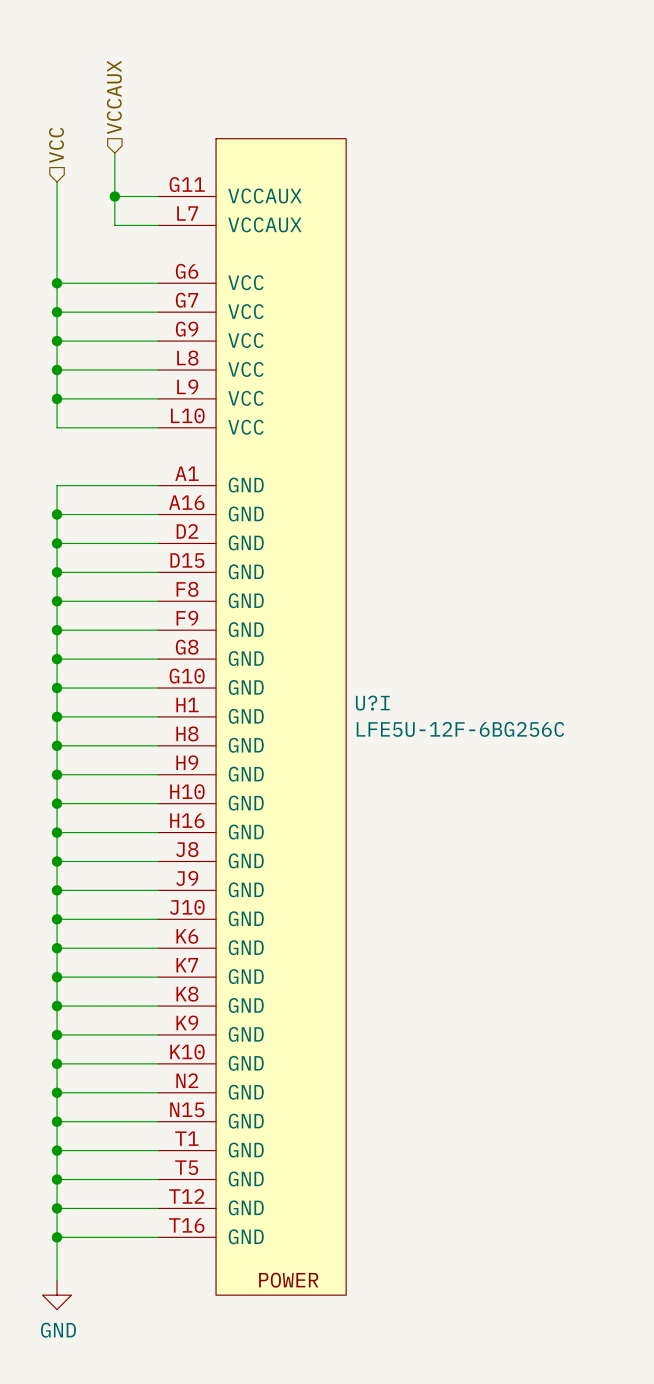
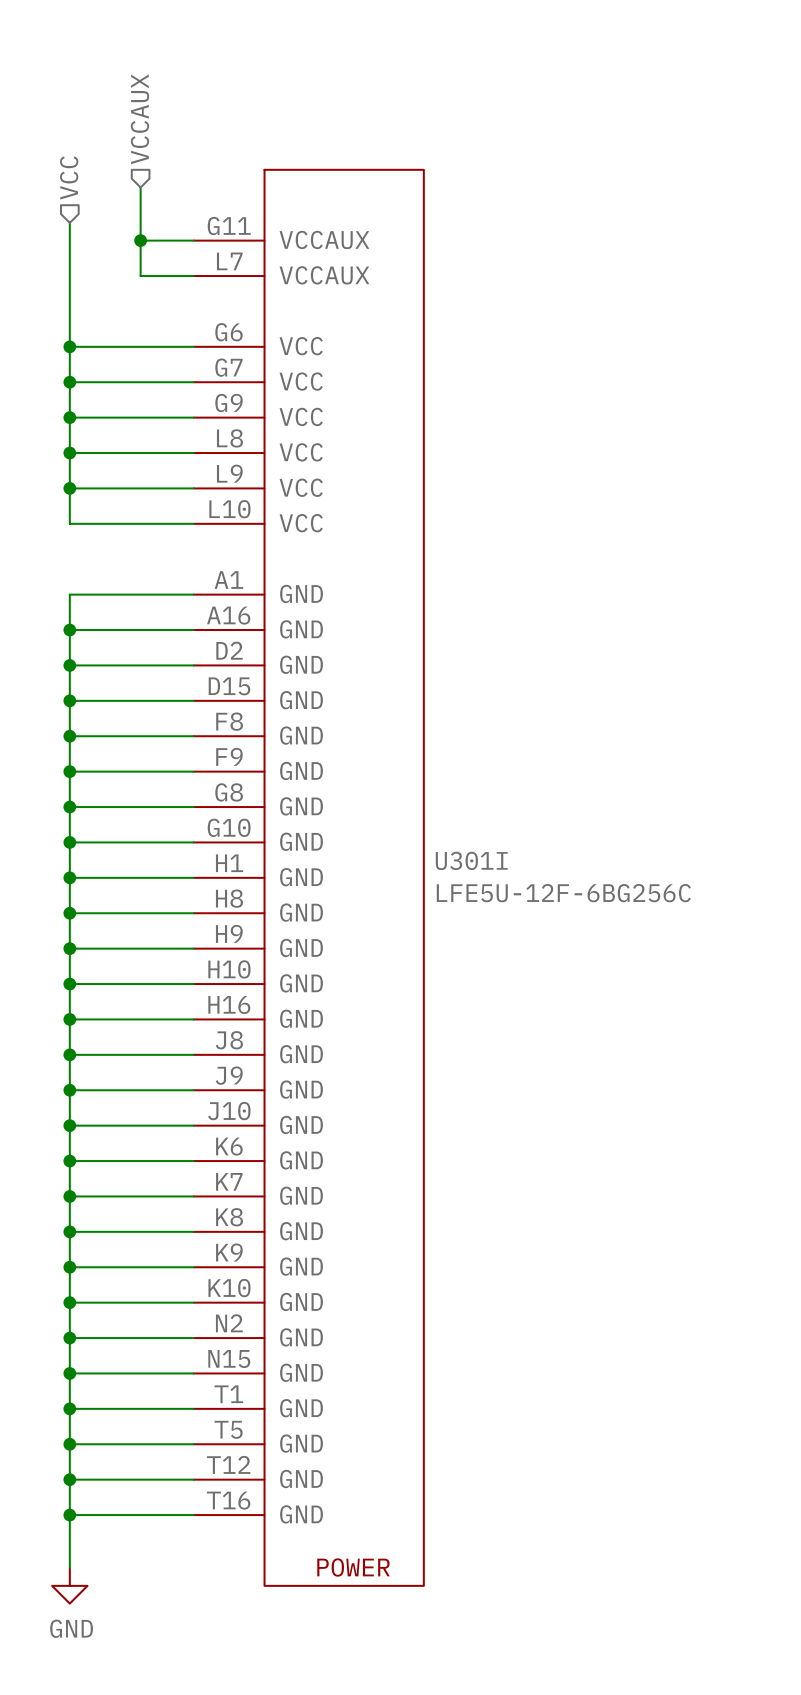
U?I name: U?I (372, 703) -> U301I (471, 860)

